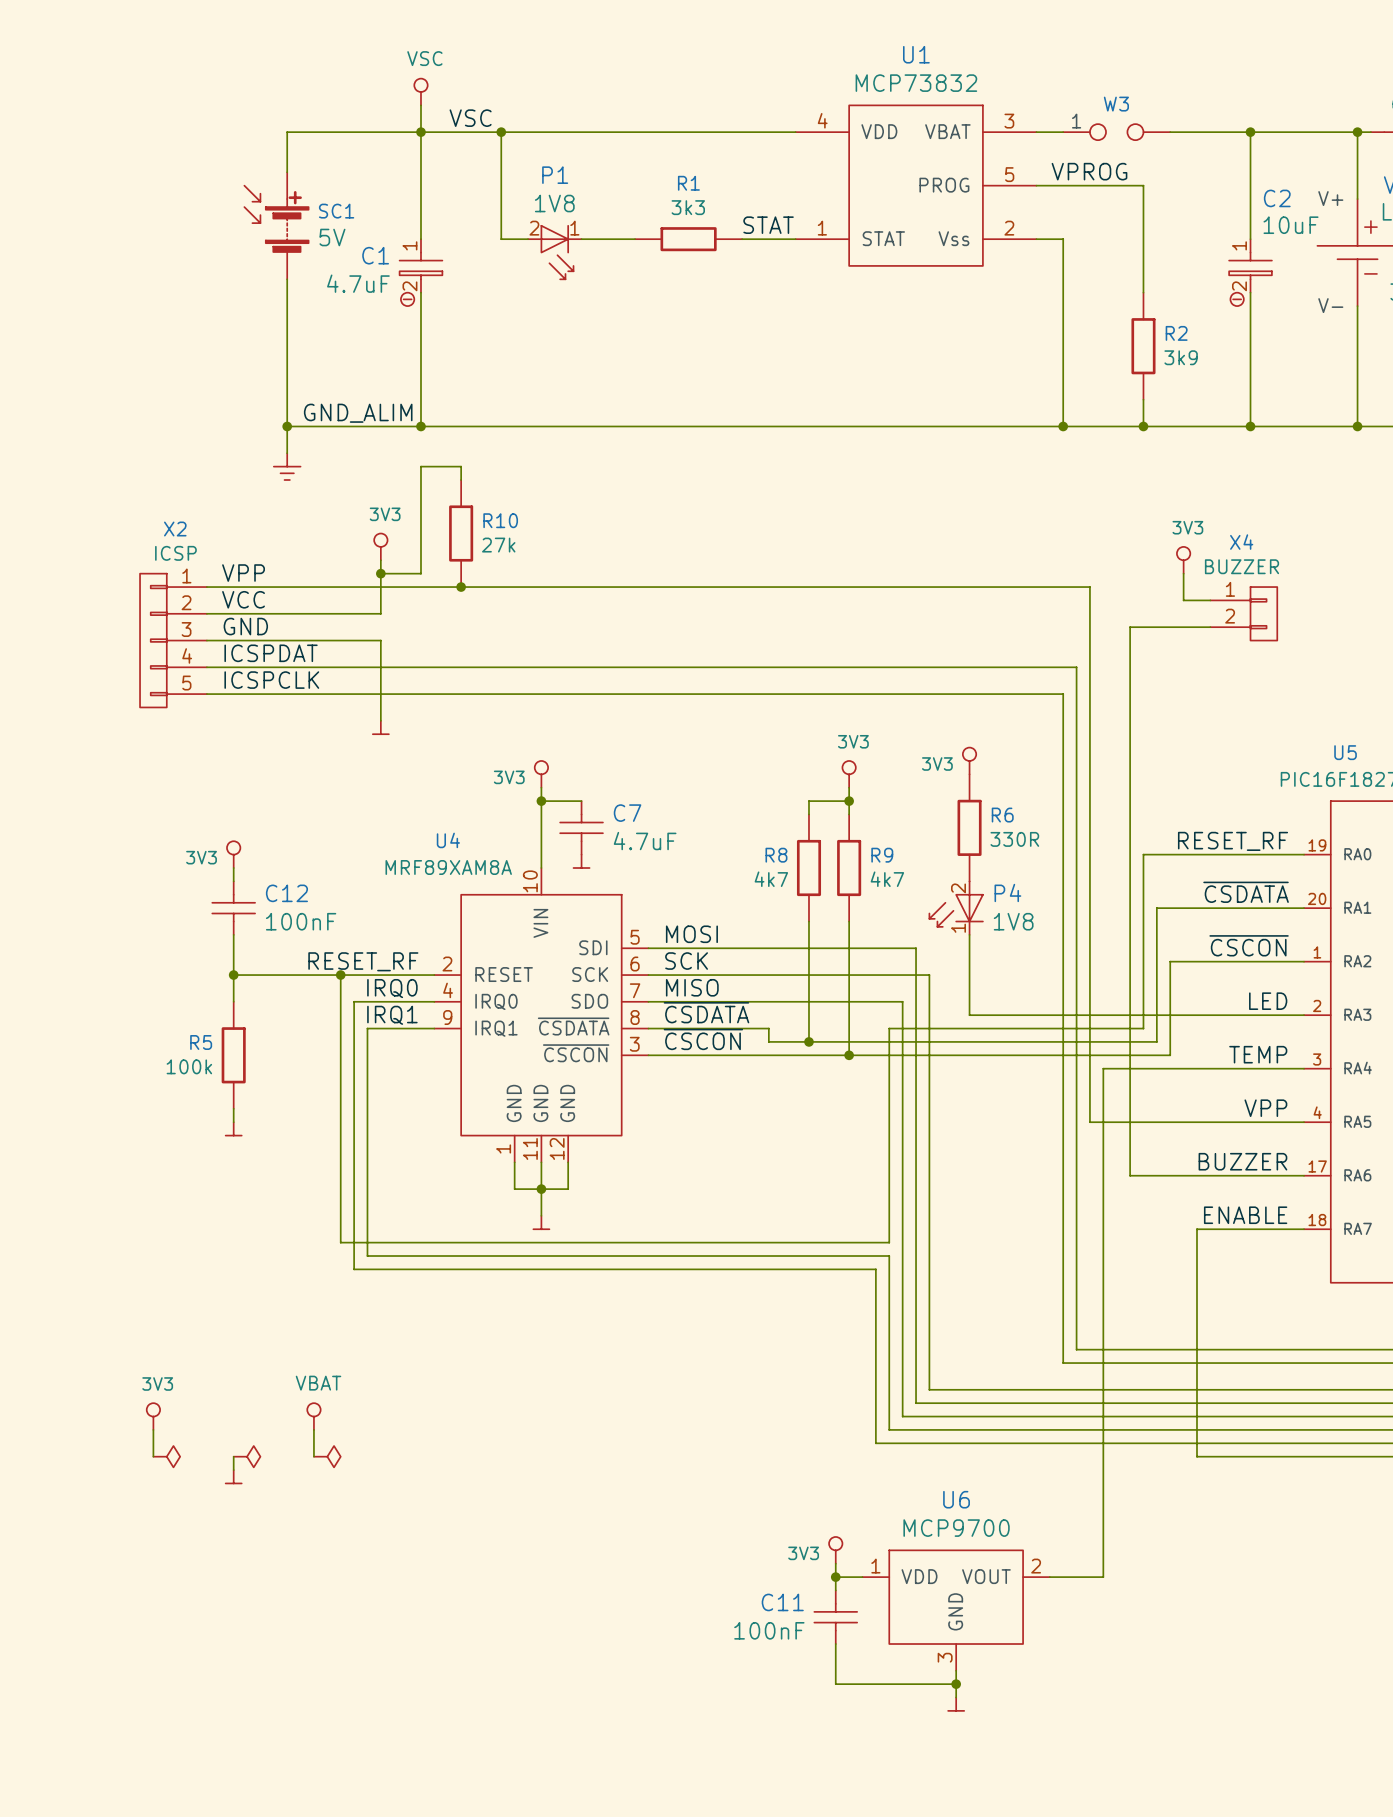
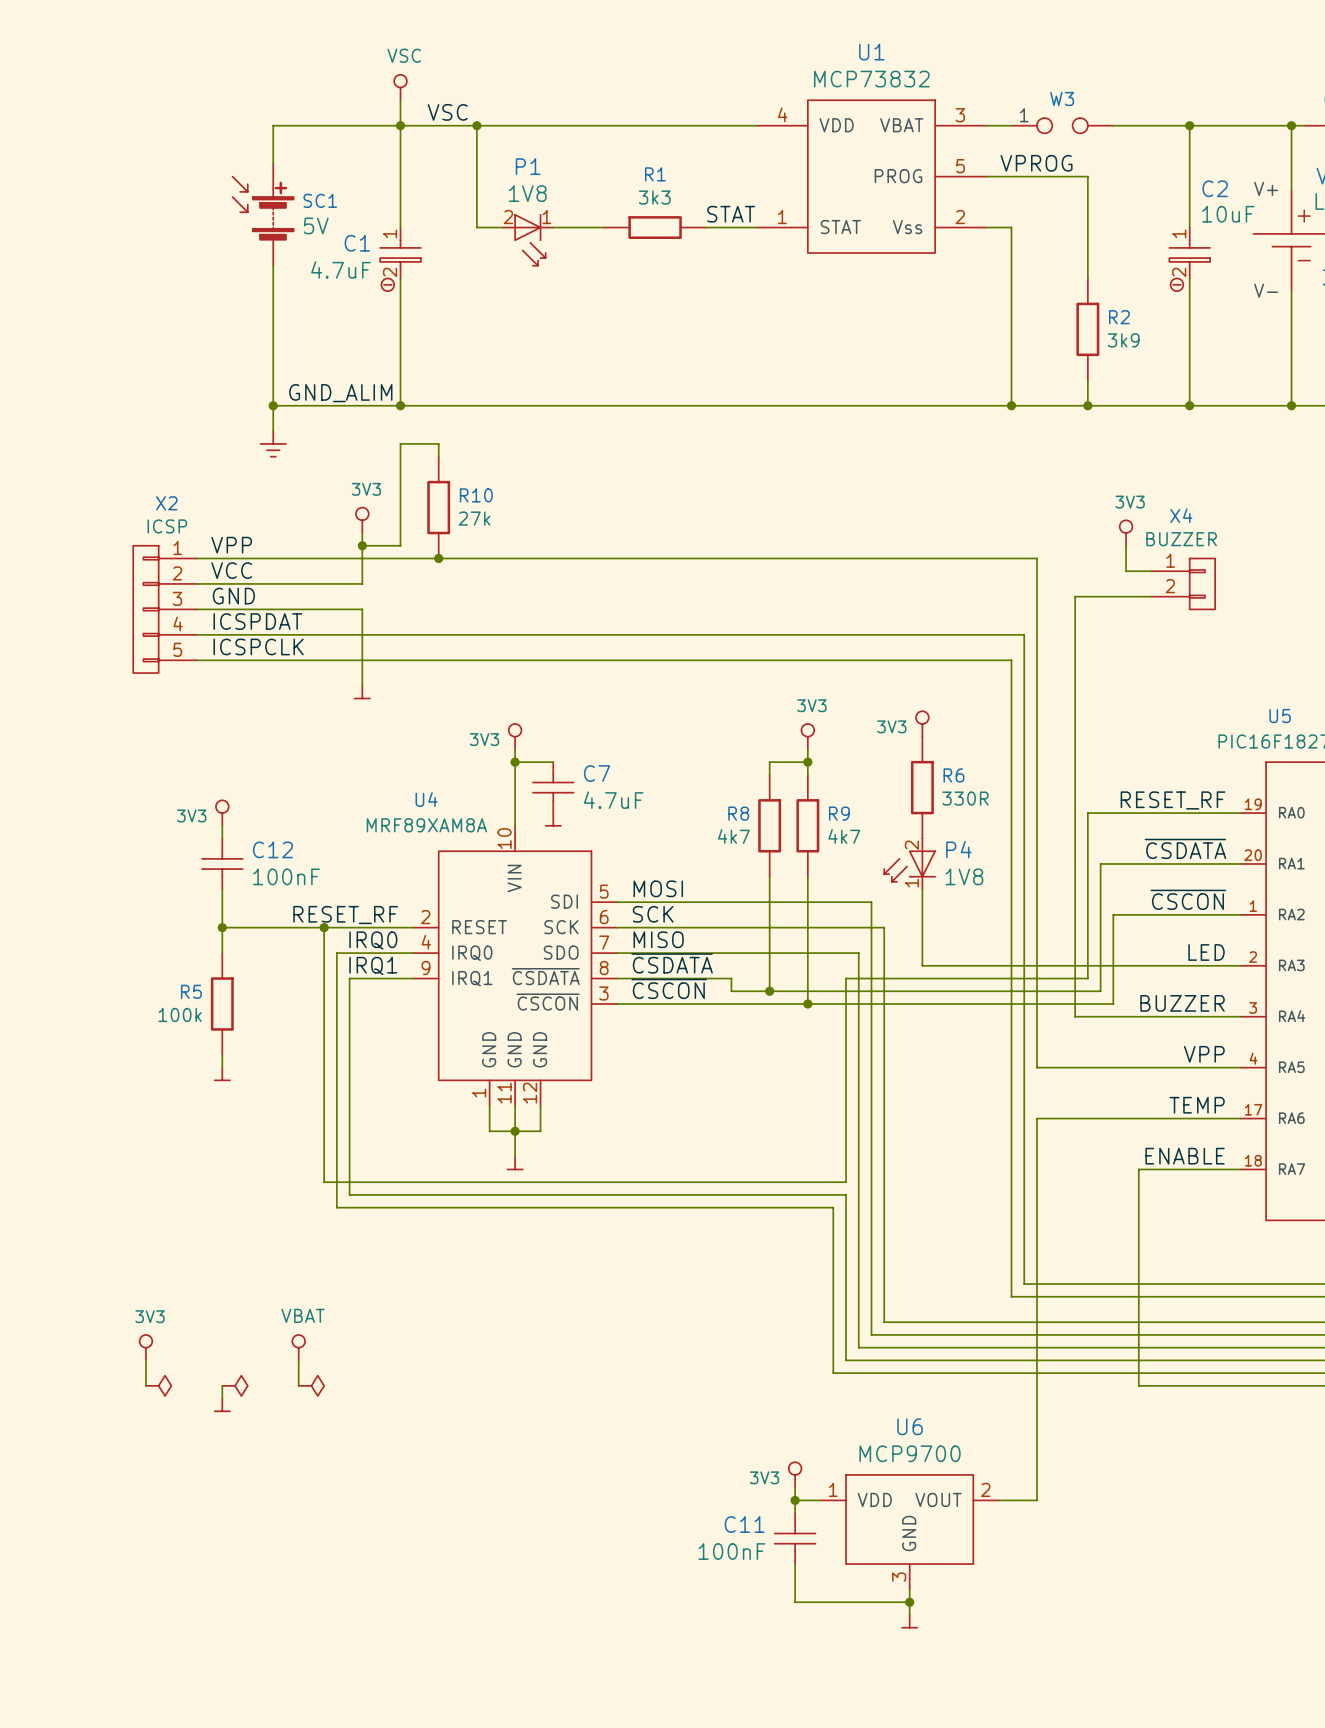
label: TEMP (1258, 1054) -> BUZZER (1182, 1003)
label: BUZZER (1242, 1161) -> TEMP (1197, 1105)
wire: (1130, 1175) (1130, 1068) (1103, 1068) (1103, 1577) (1089, 1577) -> (1075, 1118) (1036, 1118) (1036, 1500)

